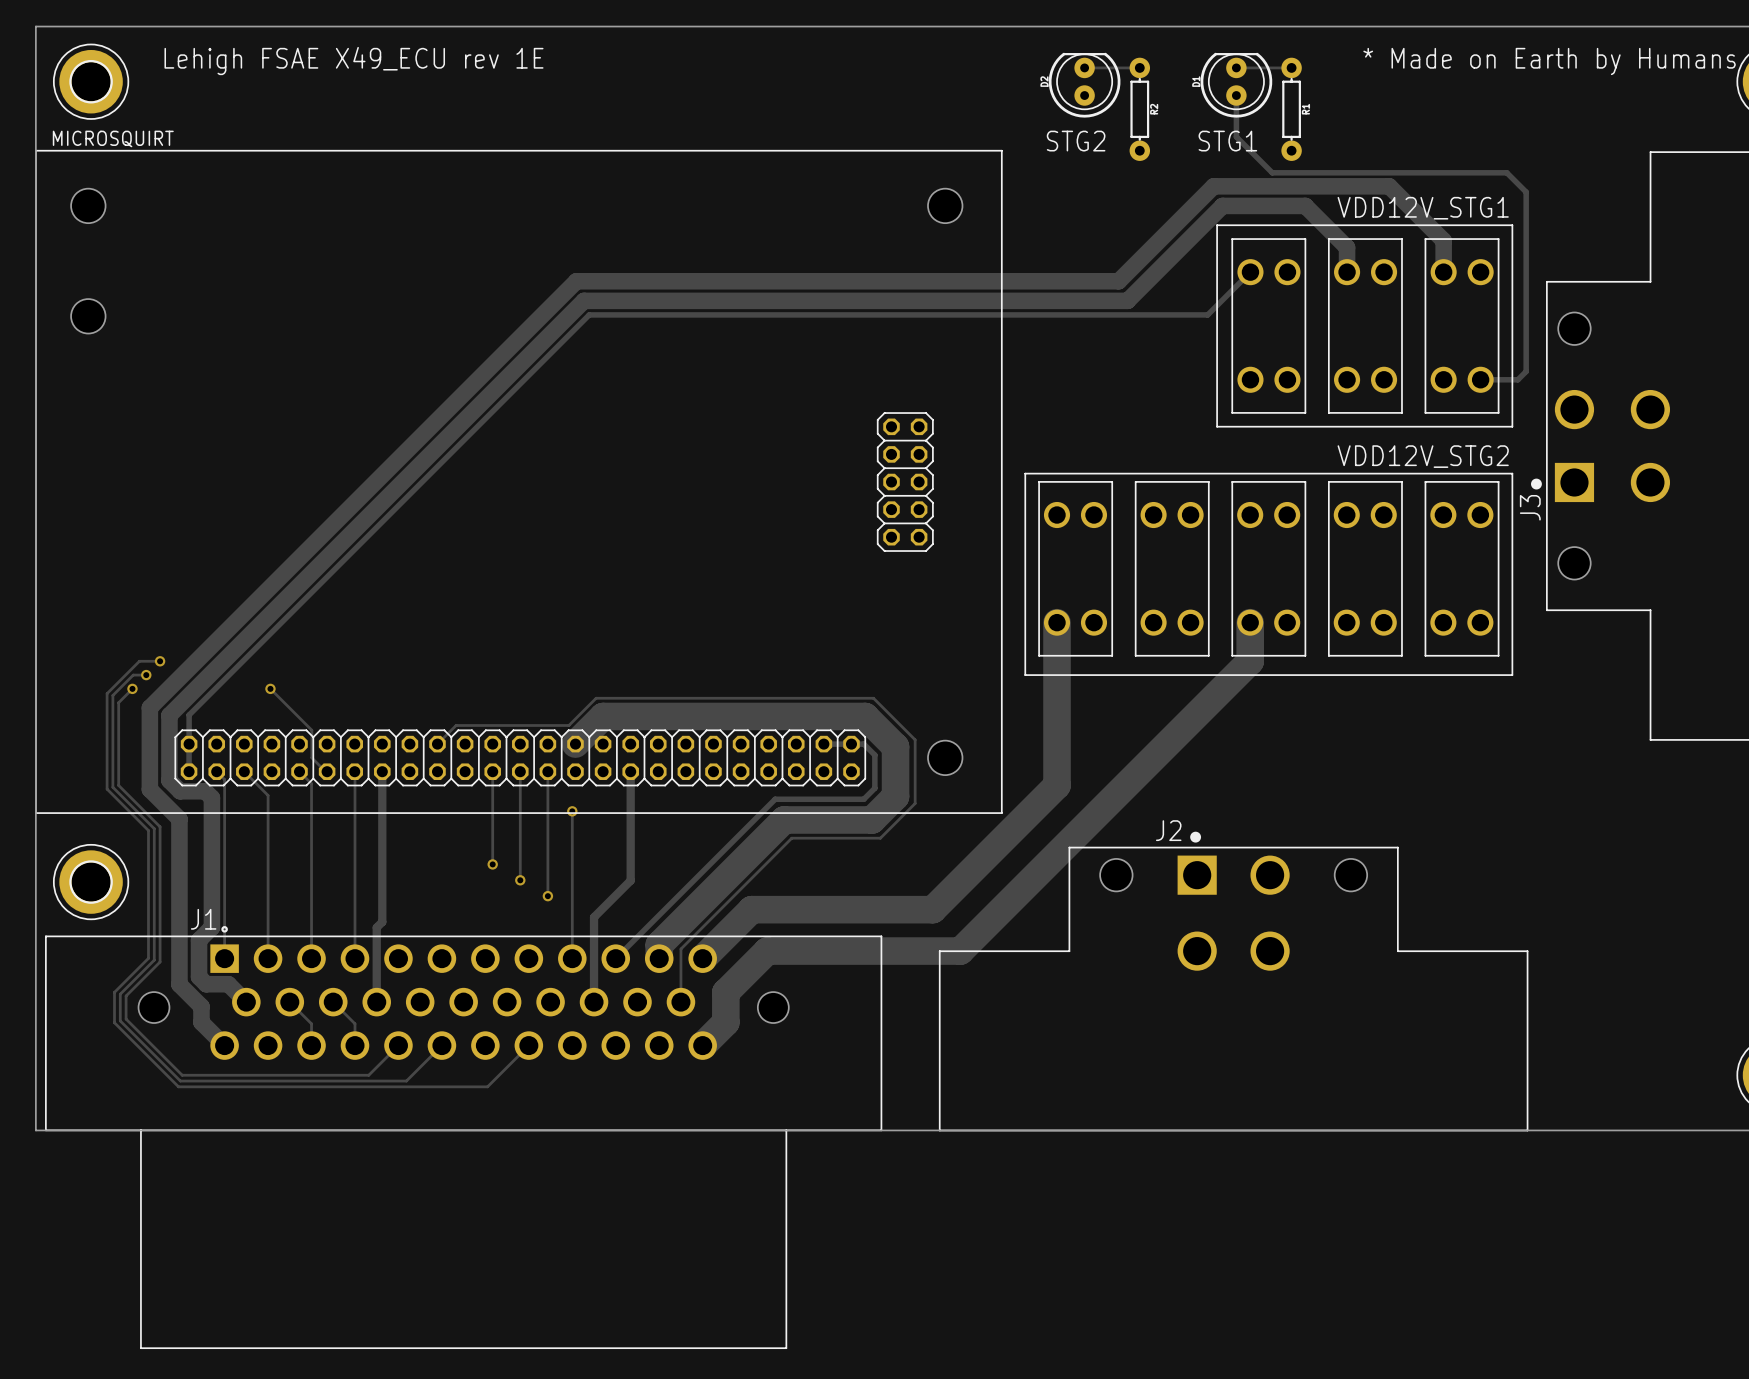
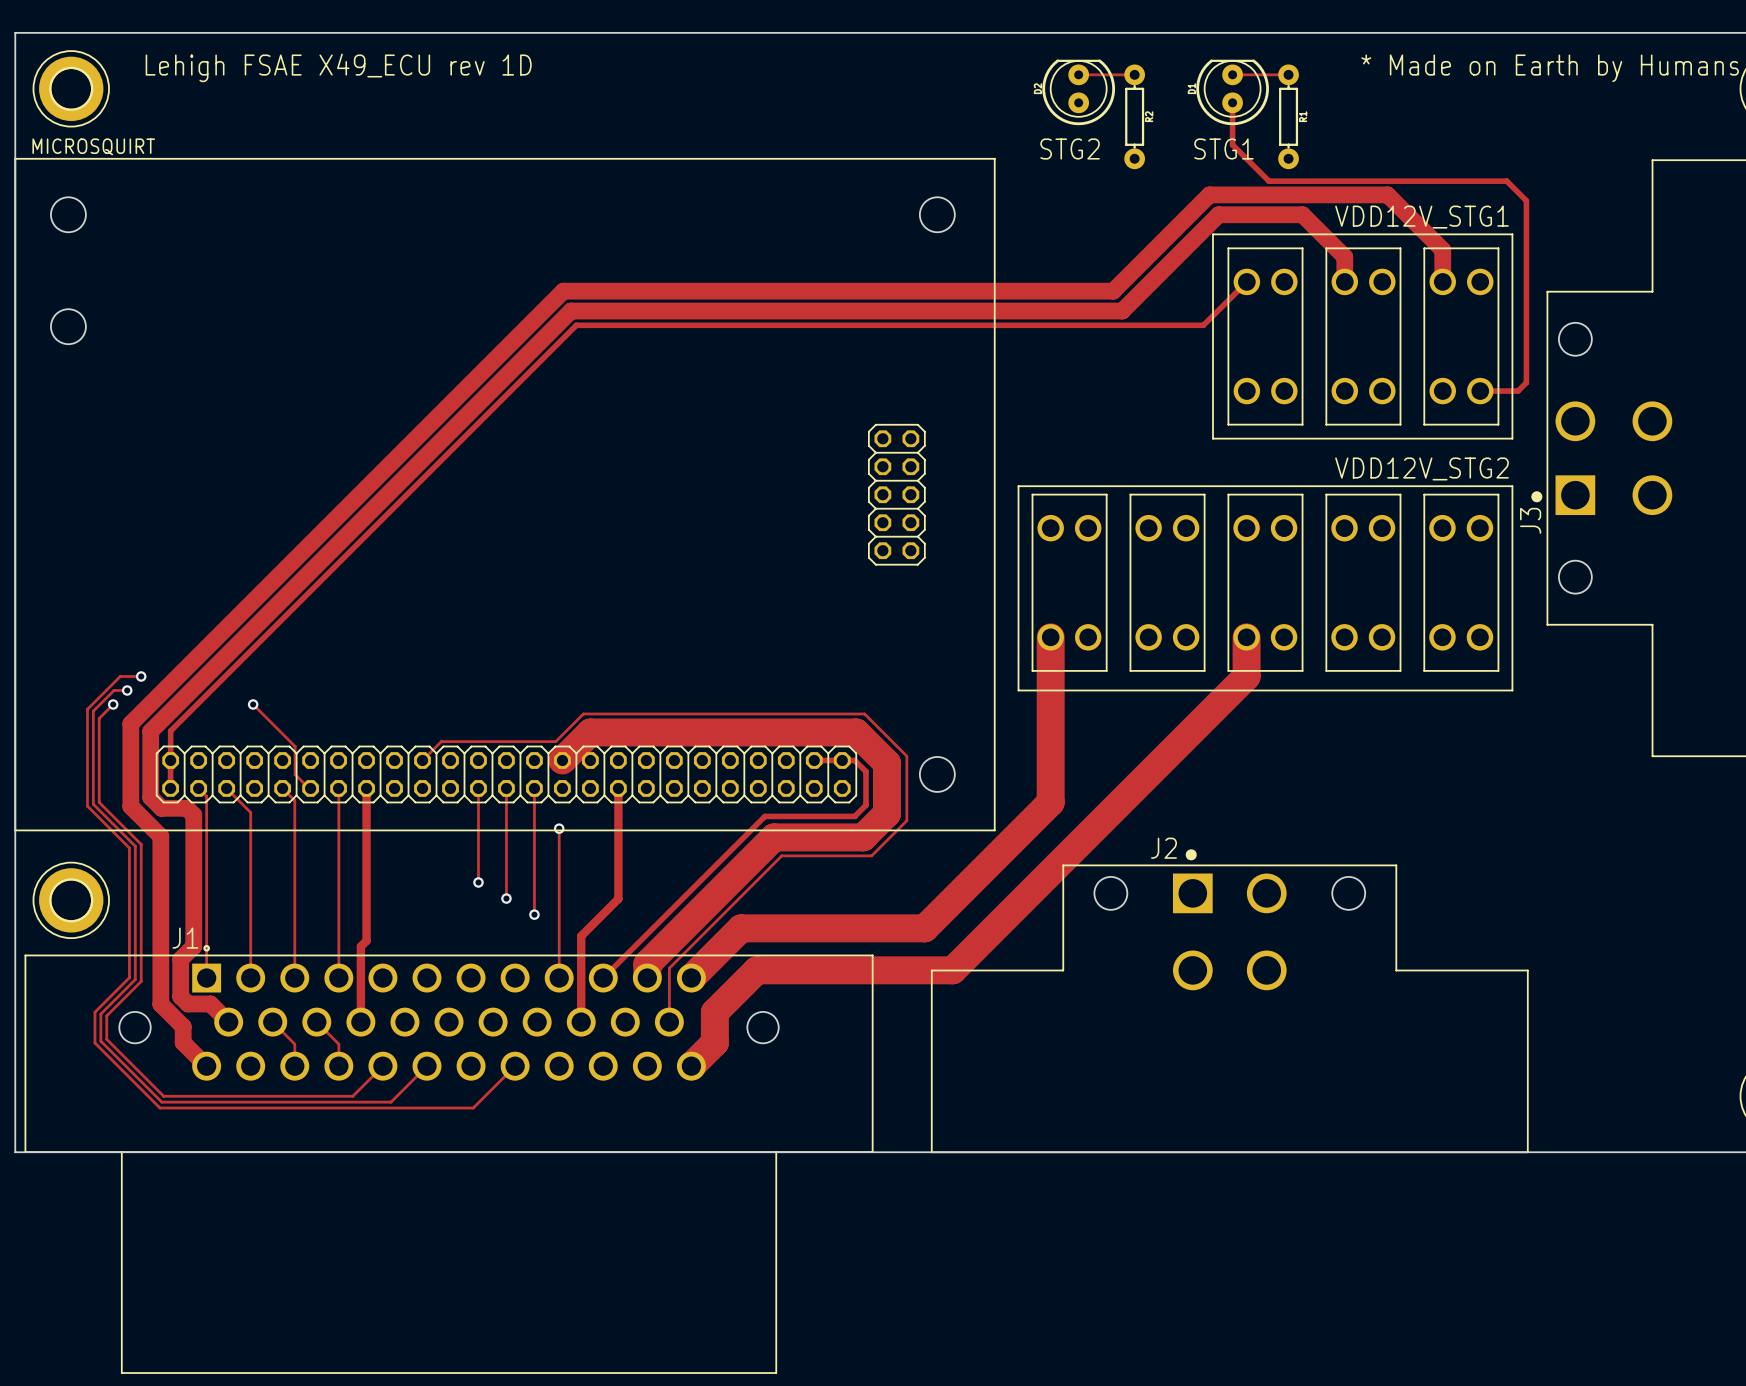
text: Lehigh FSAE X49_ECU rev 1E (354, 61) -> Lehigh FSAE X49_ECU rev 1D (338, 67)

